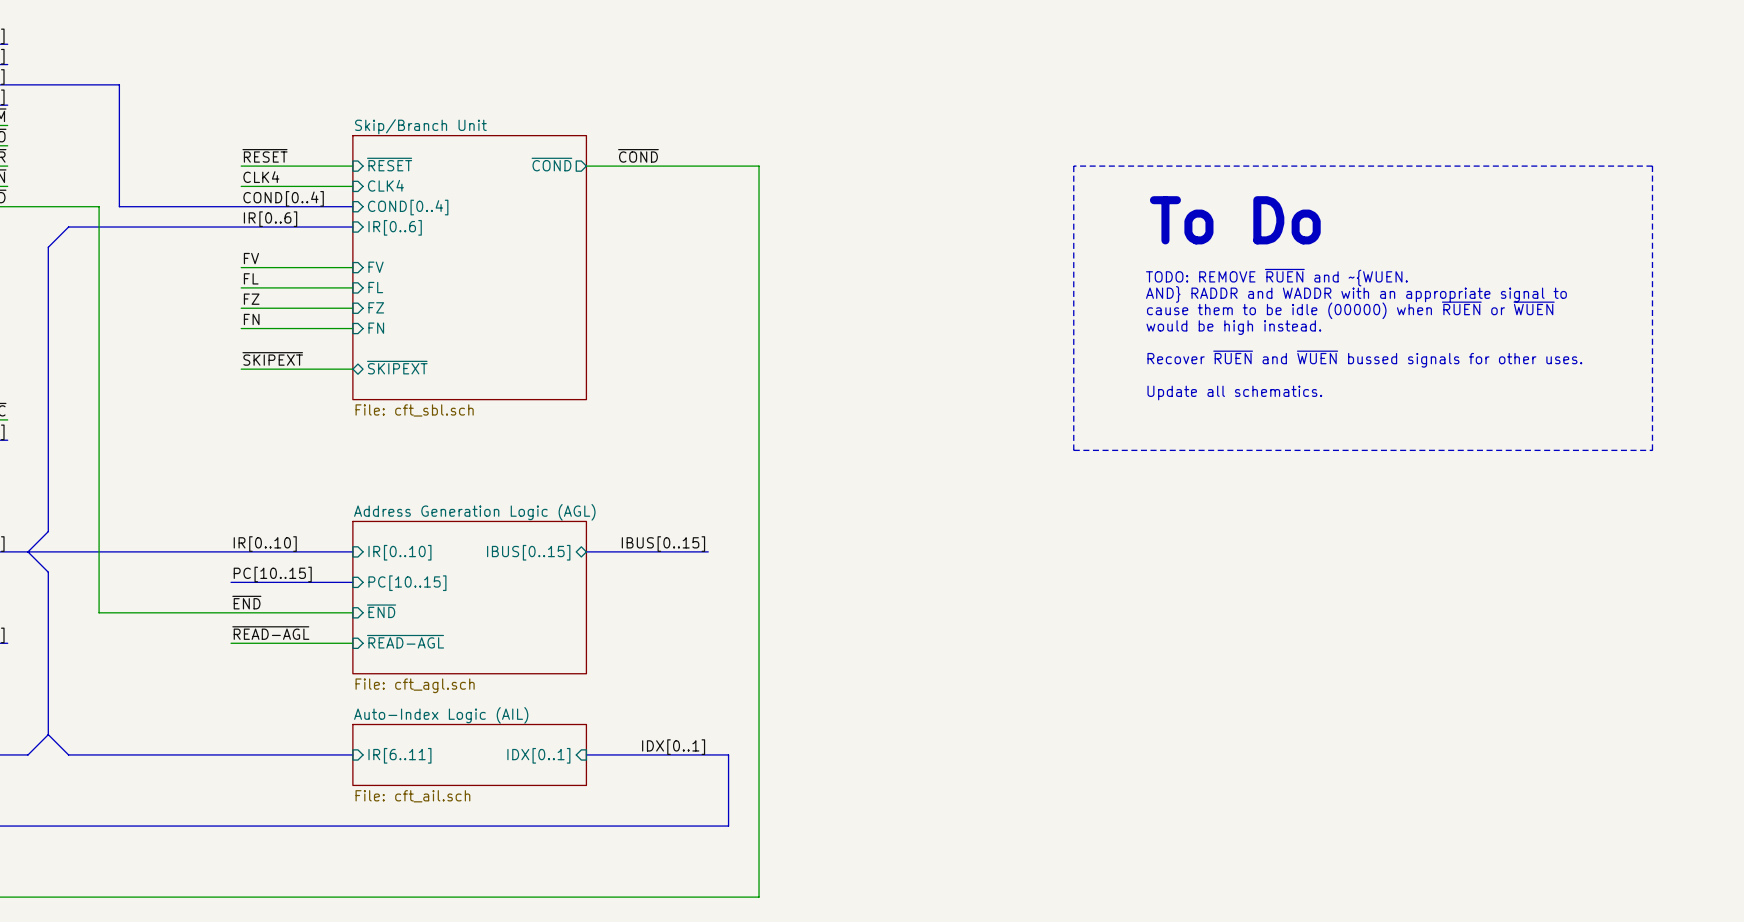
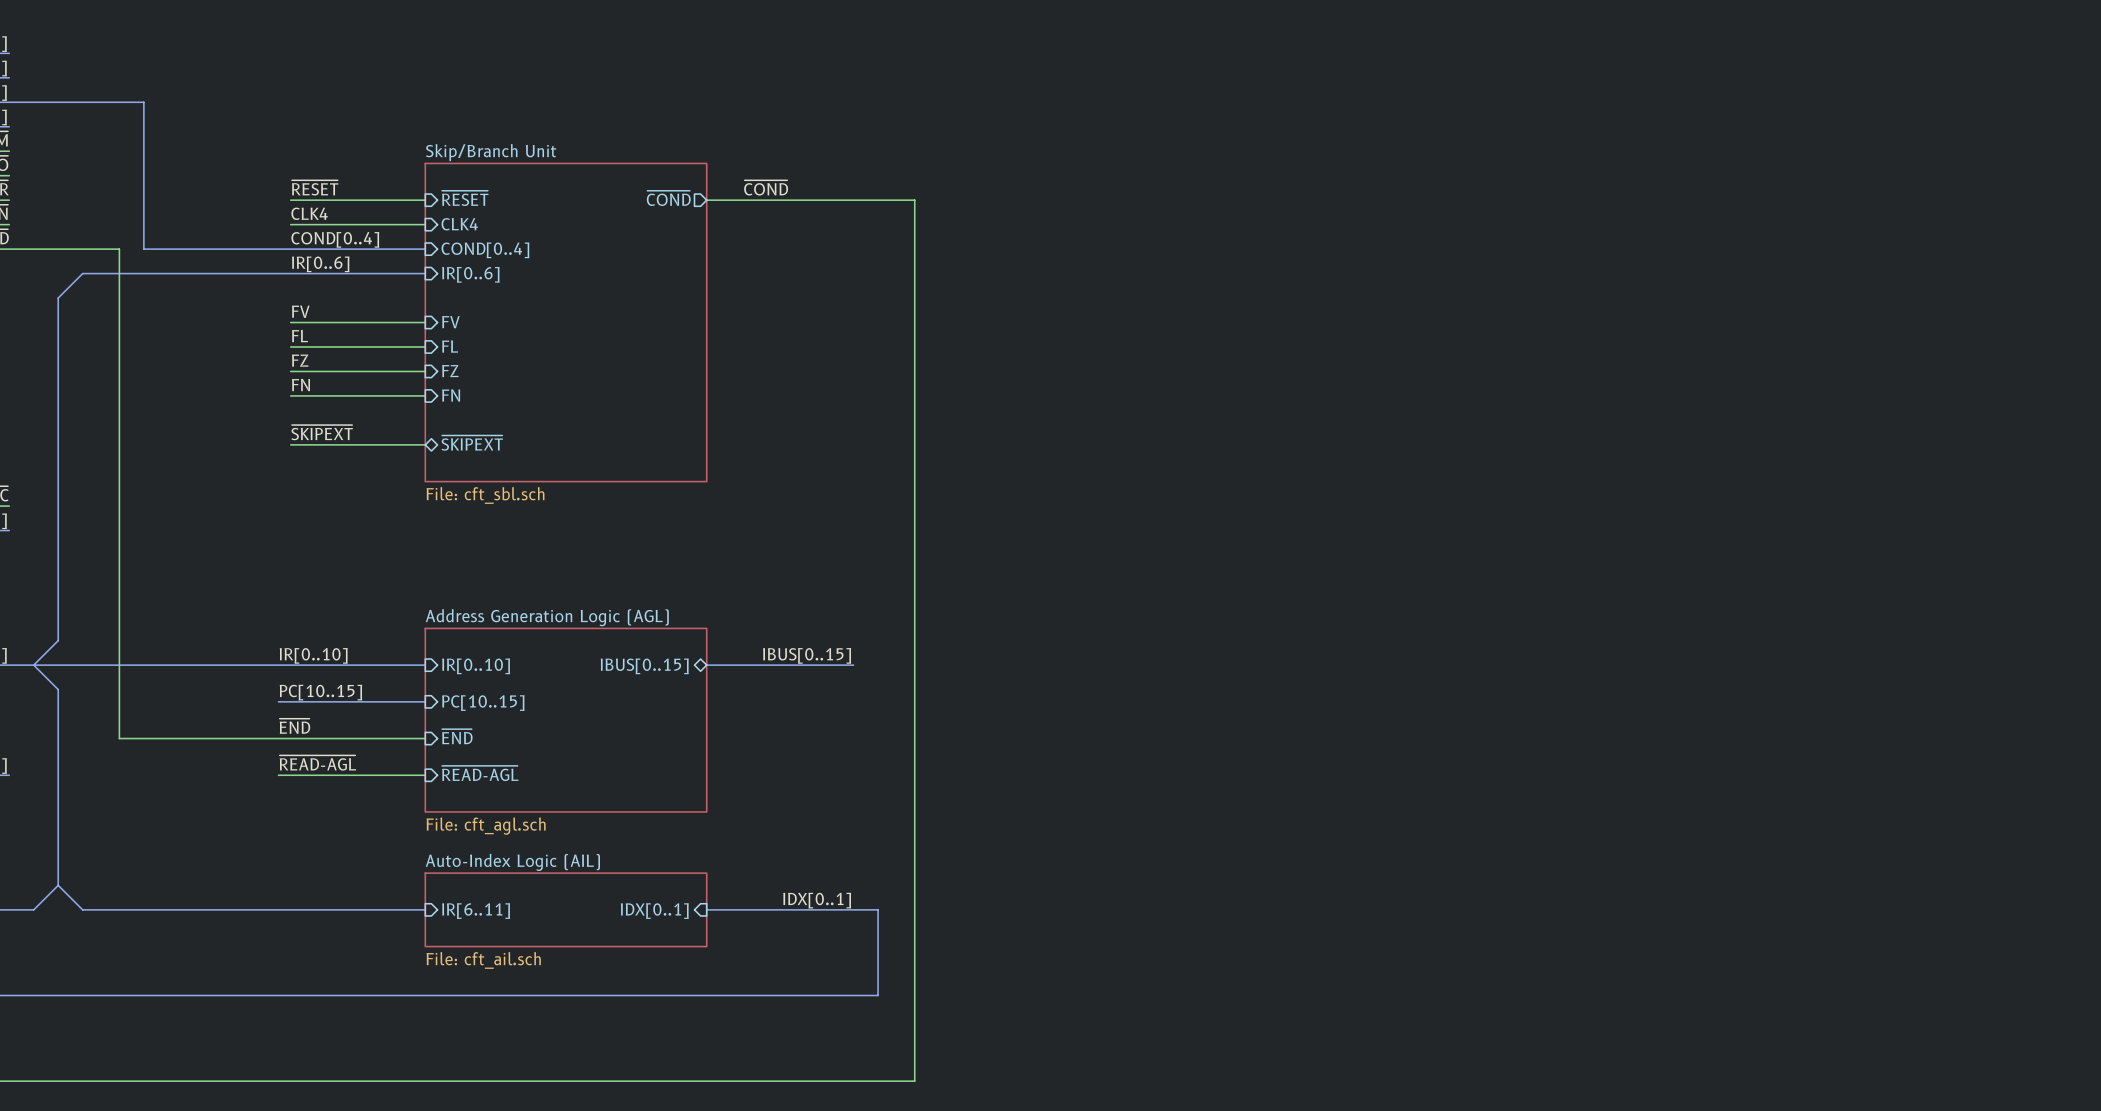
line: (1073, 166) (1073, 450) (1652, 450) (1652, 166) (1073, 166) -> none
text: To Do (1235, 220) -> none
text: TODO: REMOVE ~{RUEN} and ~{WUEN. (1276, 277) -> none
text: AND} RADDR and WADDR with an appropriate signal to (1356, 294) -> none
text: cause them to be idle (00000) when ~{RUEN} or ~{WUEN} (1350, 310) -> none
text: would be high instead. (1233, 327) -> none
text: Recover ~{RUEN} and ~{WUEN} bussed signals for other uses. (1364, 359) -> none
text: Update all schematics. (1234, 392) -> none

